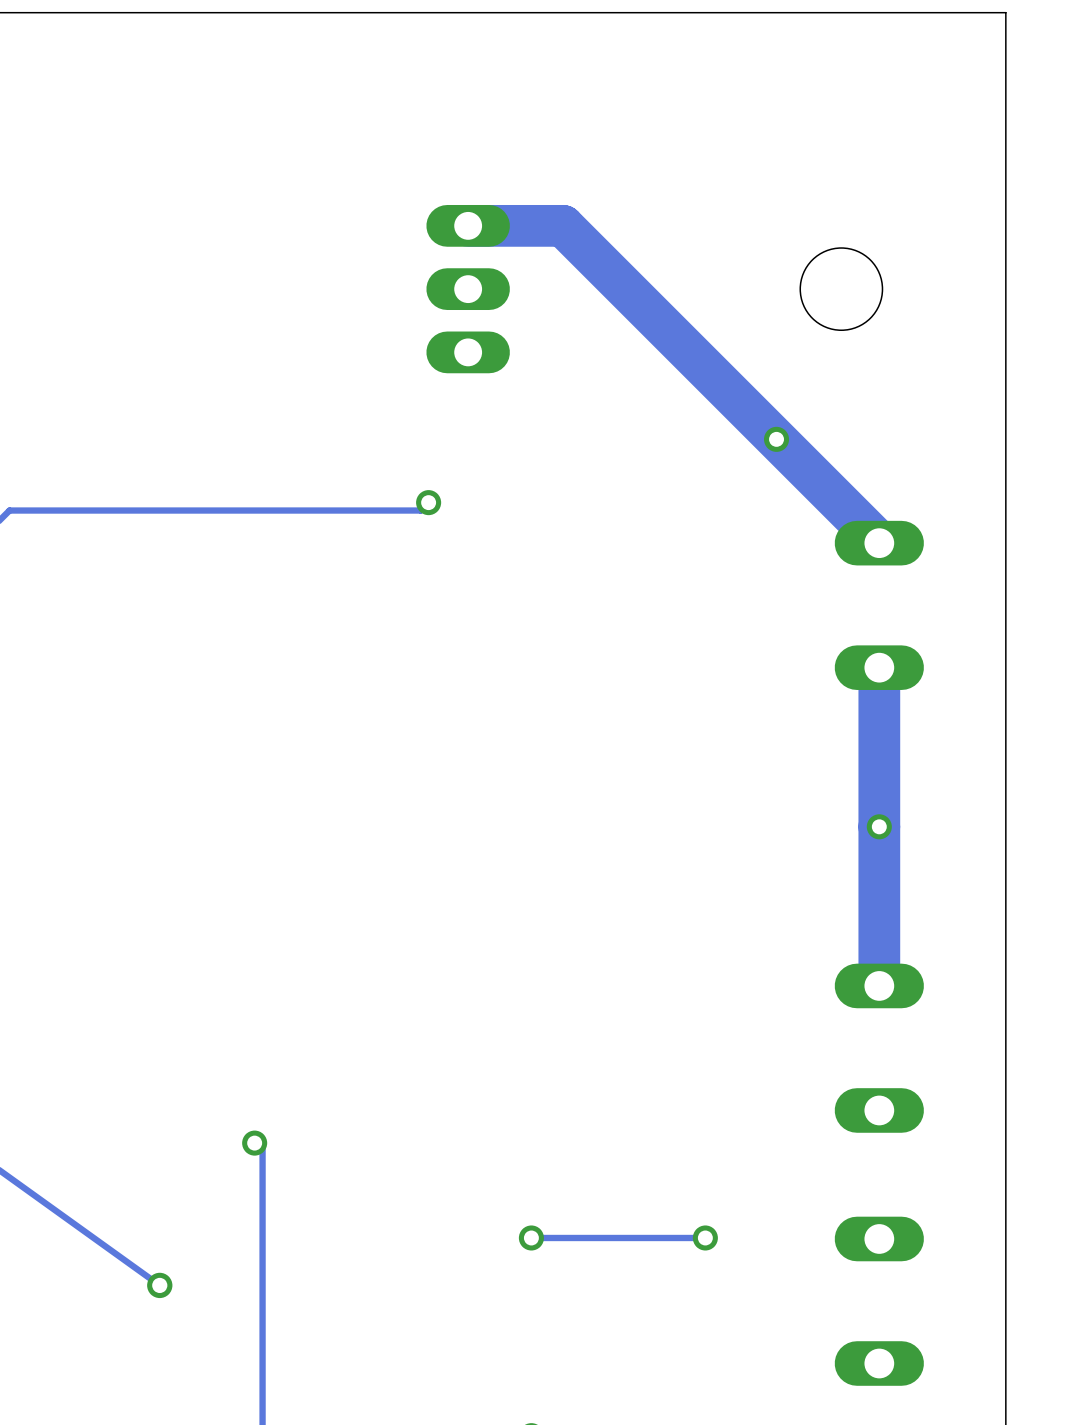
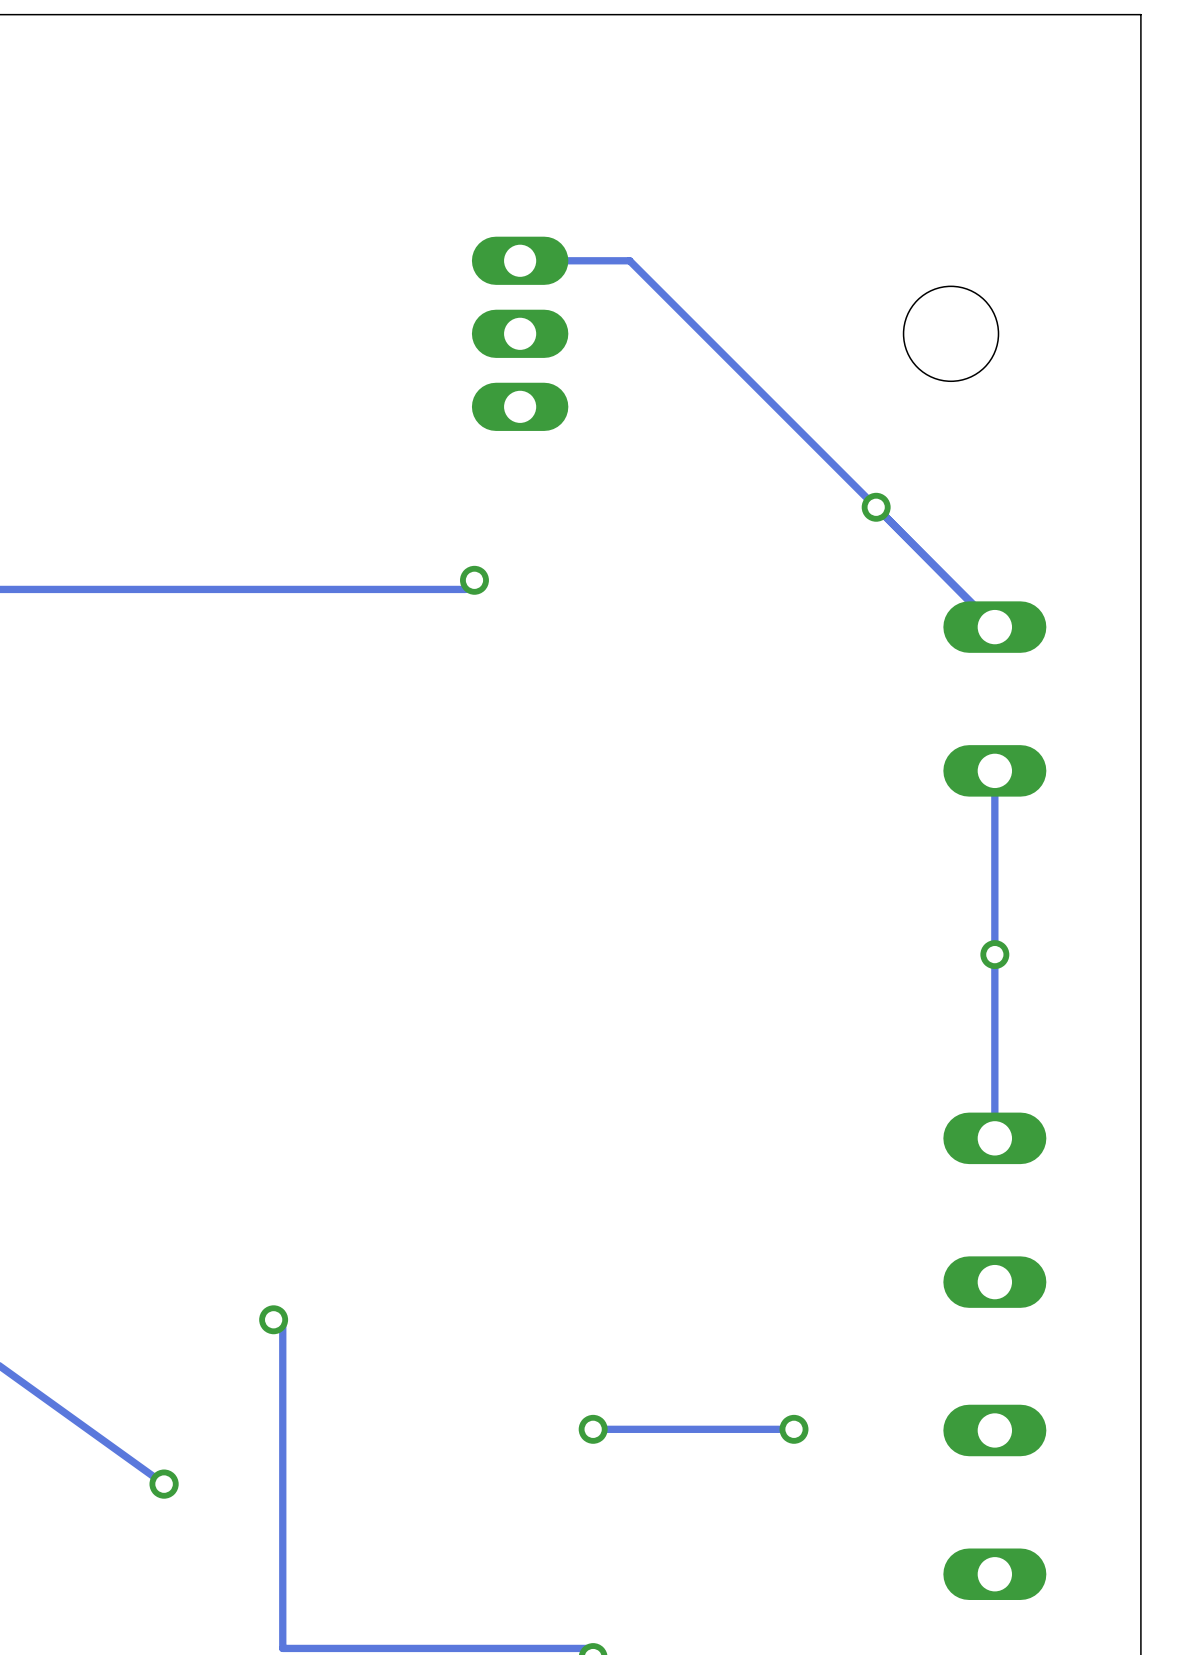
track width: thick (468, 225) (563, 225) (879, 542) -> thin (520, 260) (629, 260) (994, 625)
track width: thick (879, 667) (879, 985) -> thin (994, 770) (994, 1138)

